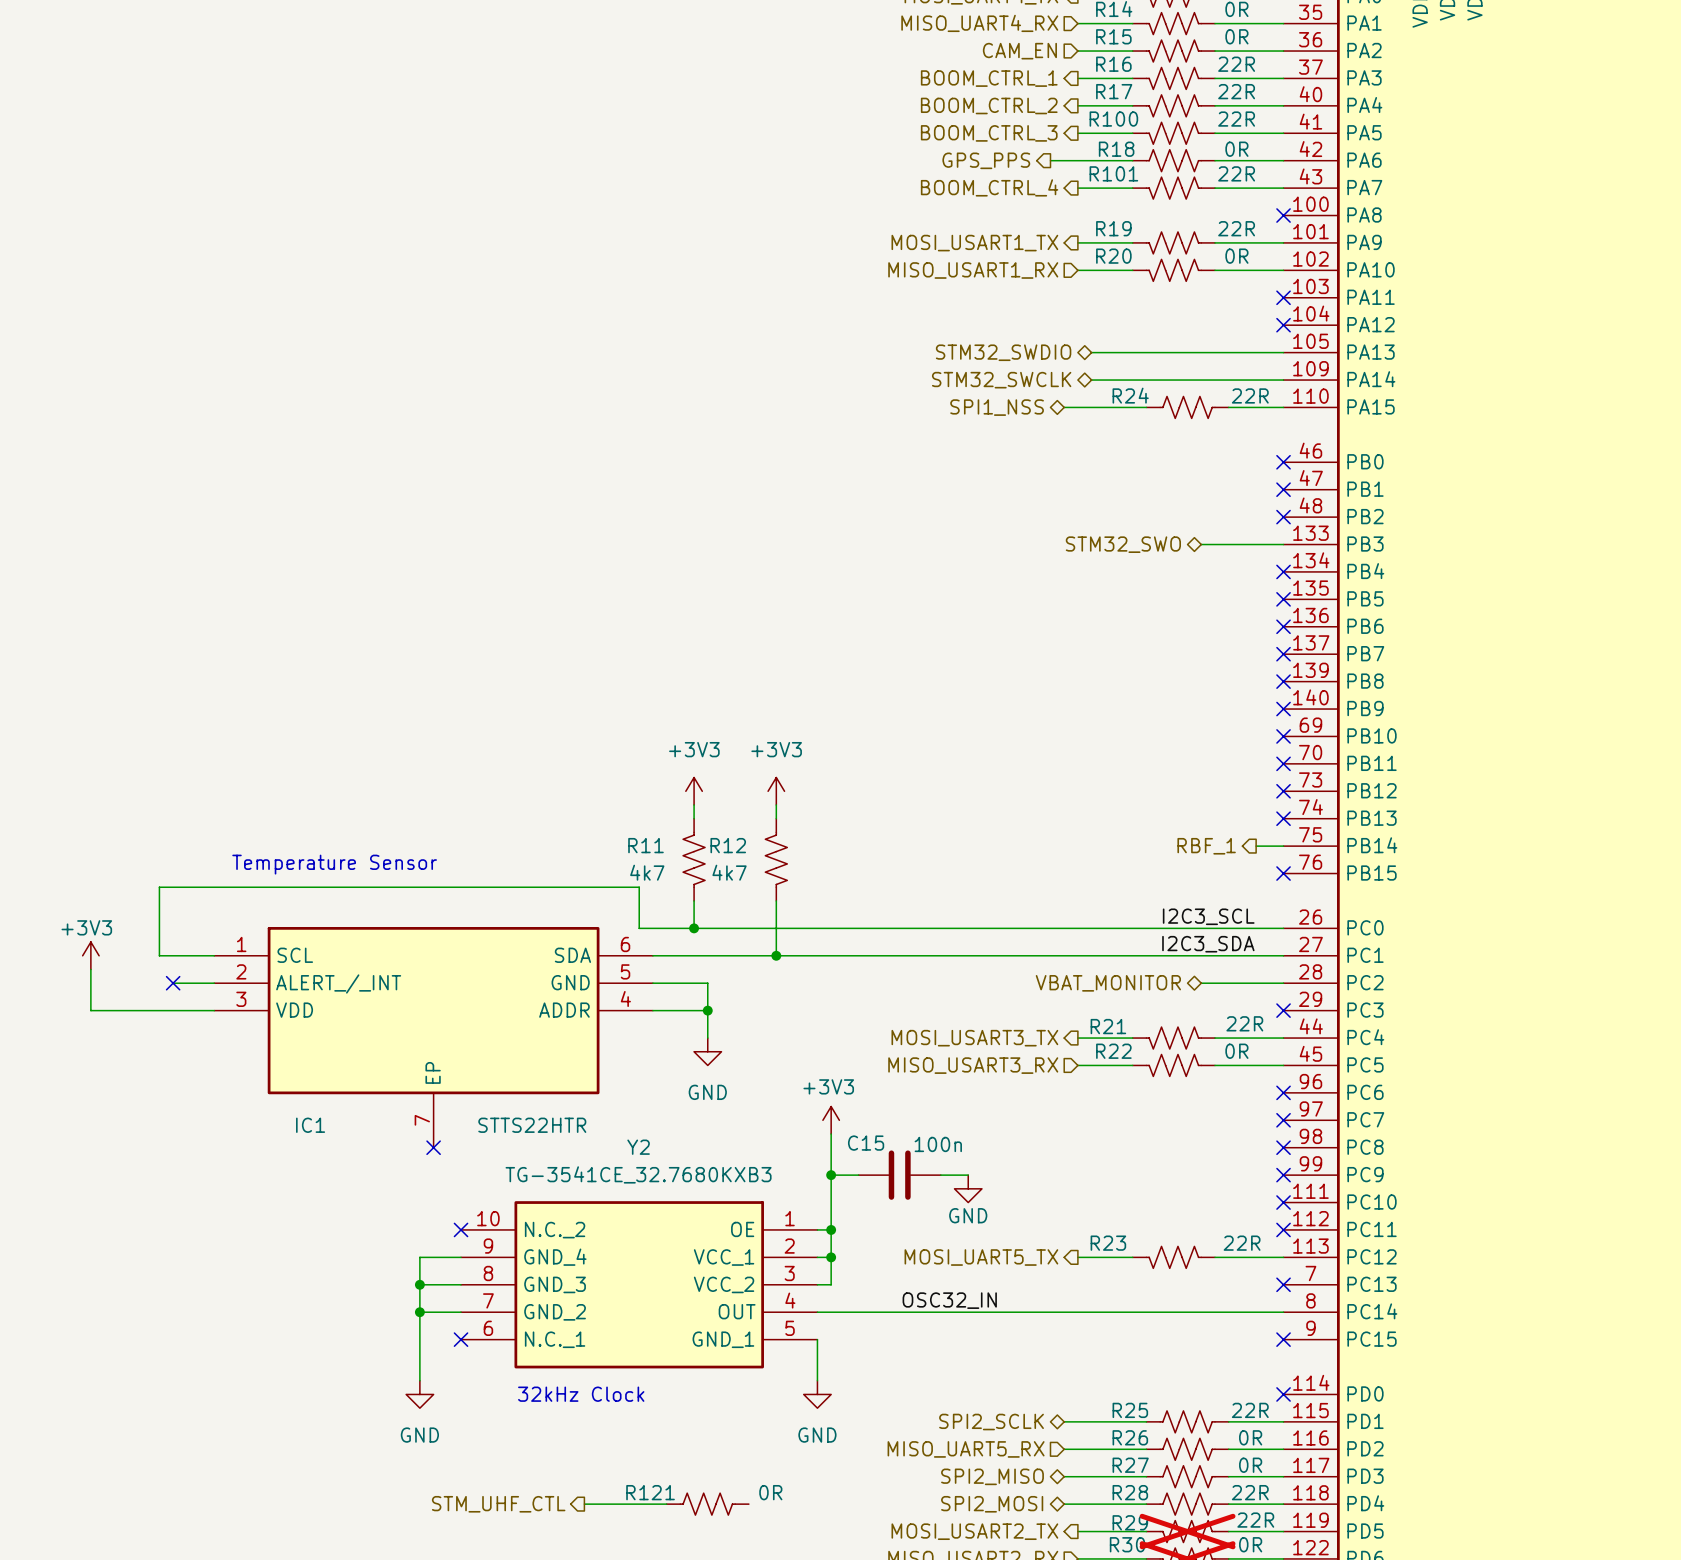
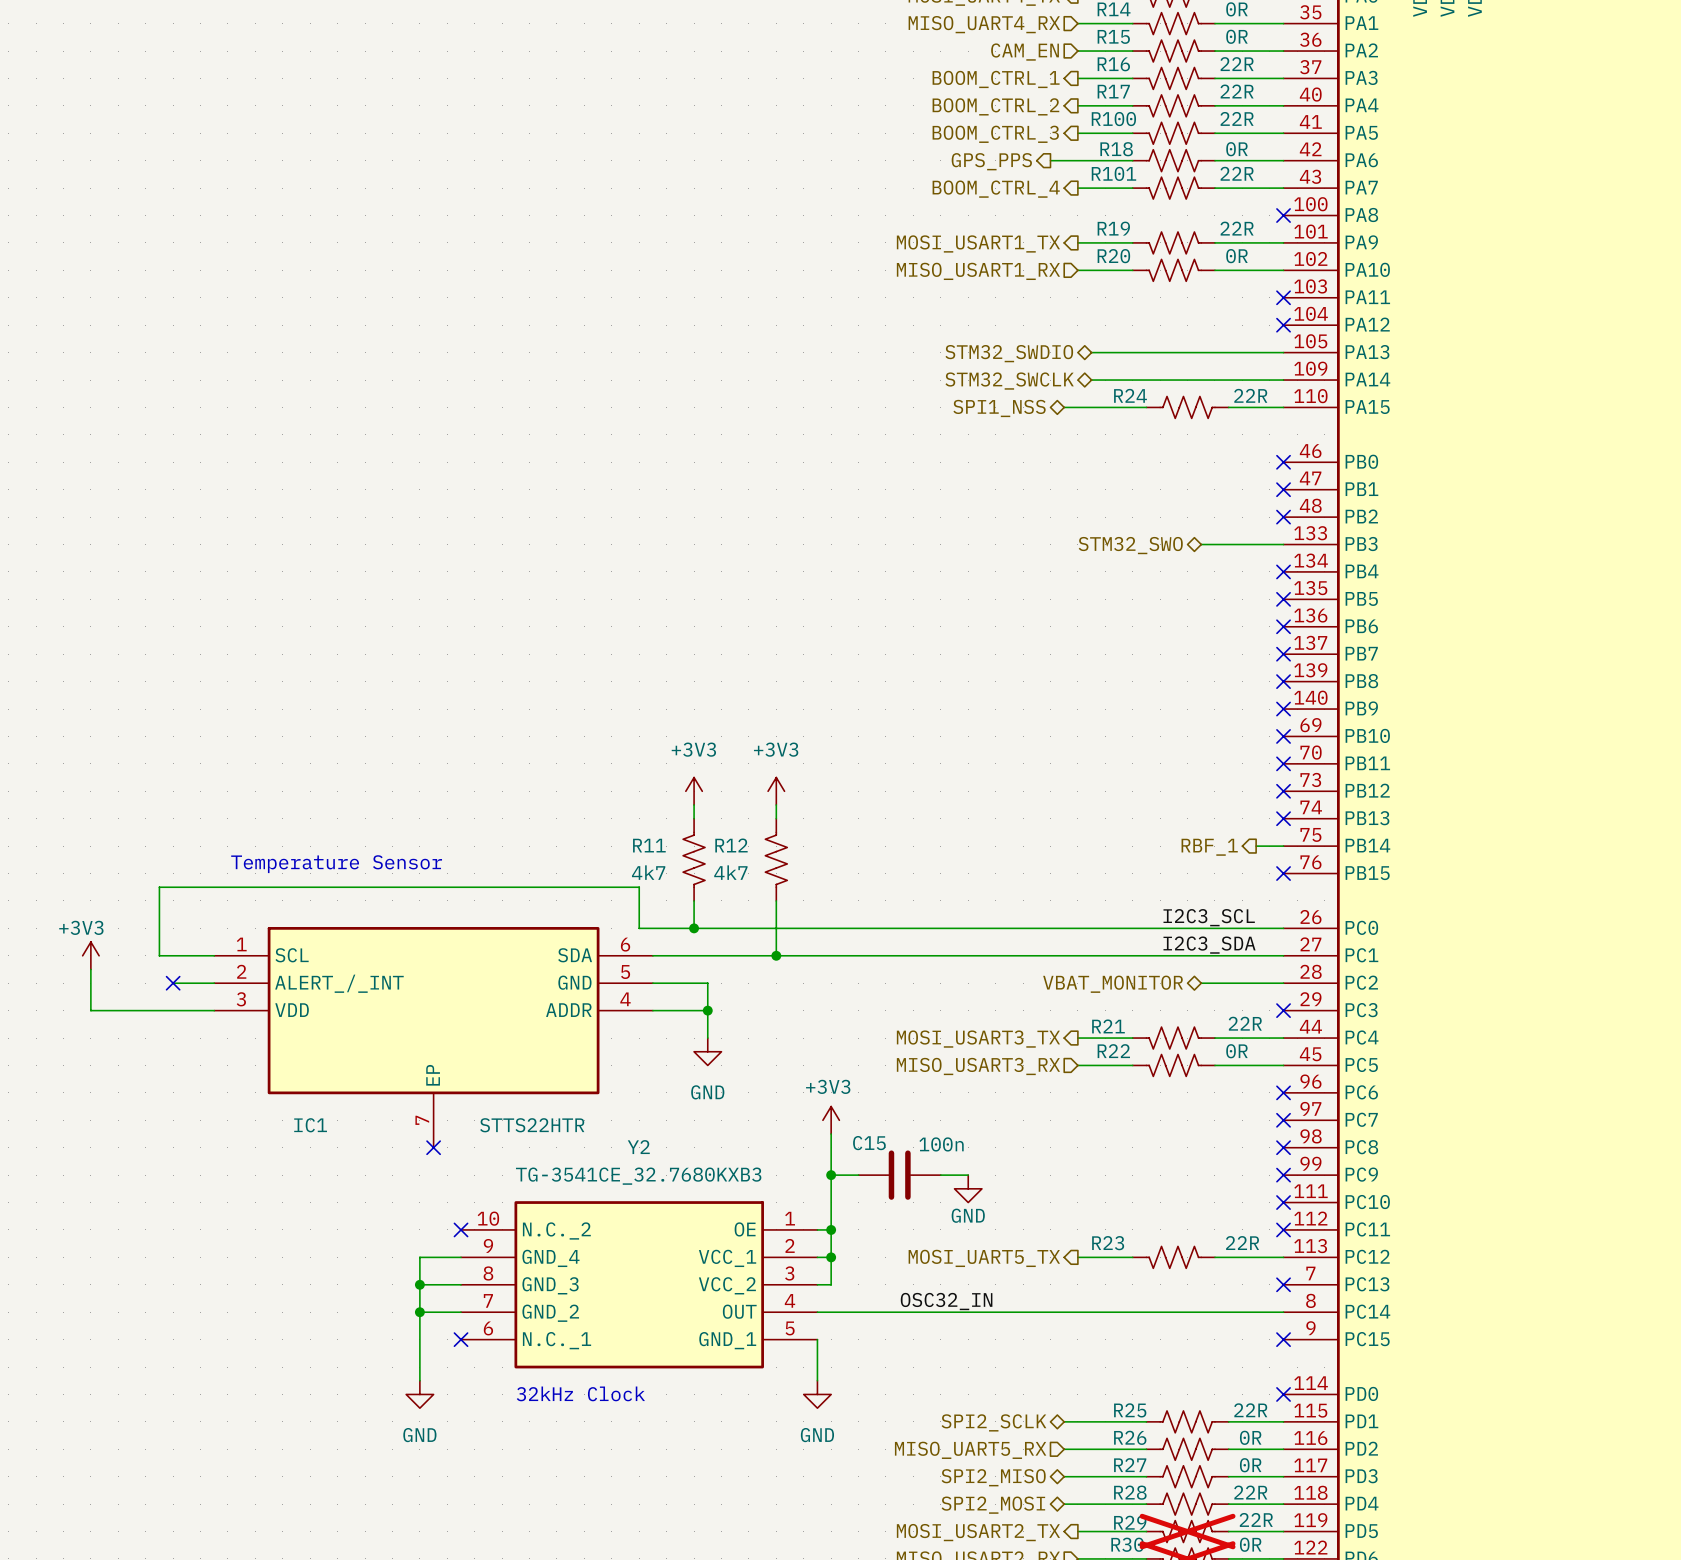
hierarchical label: STM_UHF_CTL (498, 1504) -> none
wire: (584, 1504) (666, 1504) -> none
R121: 0R (707, 1504) -> none

